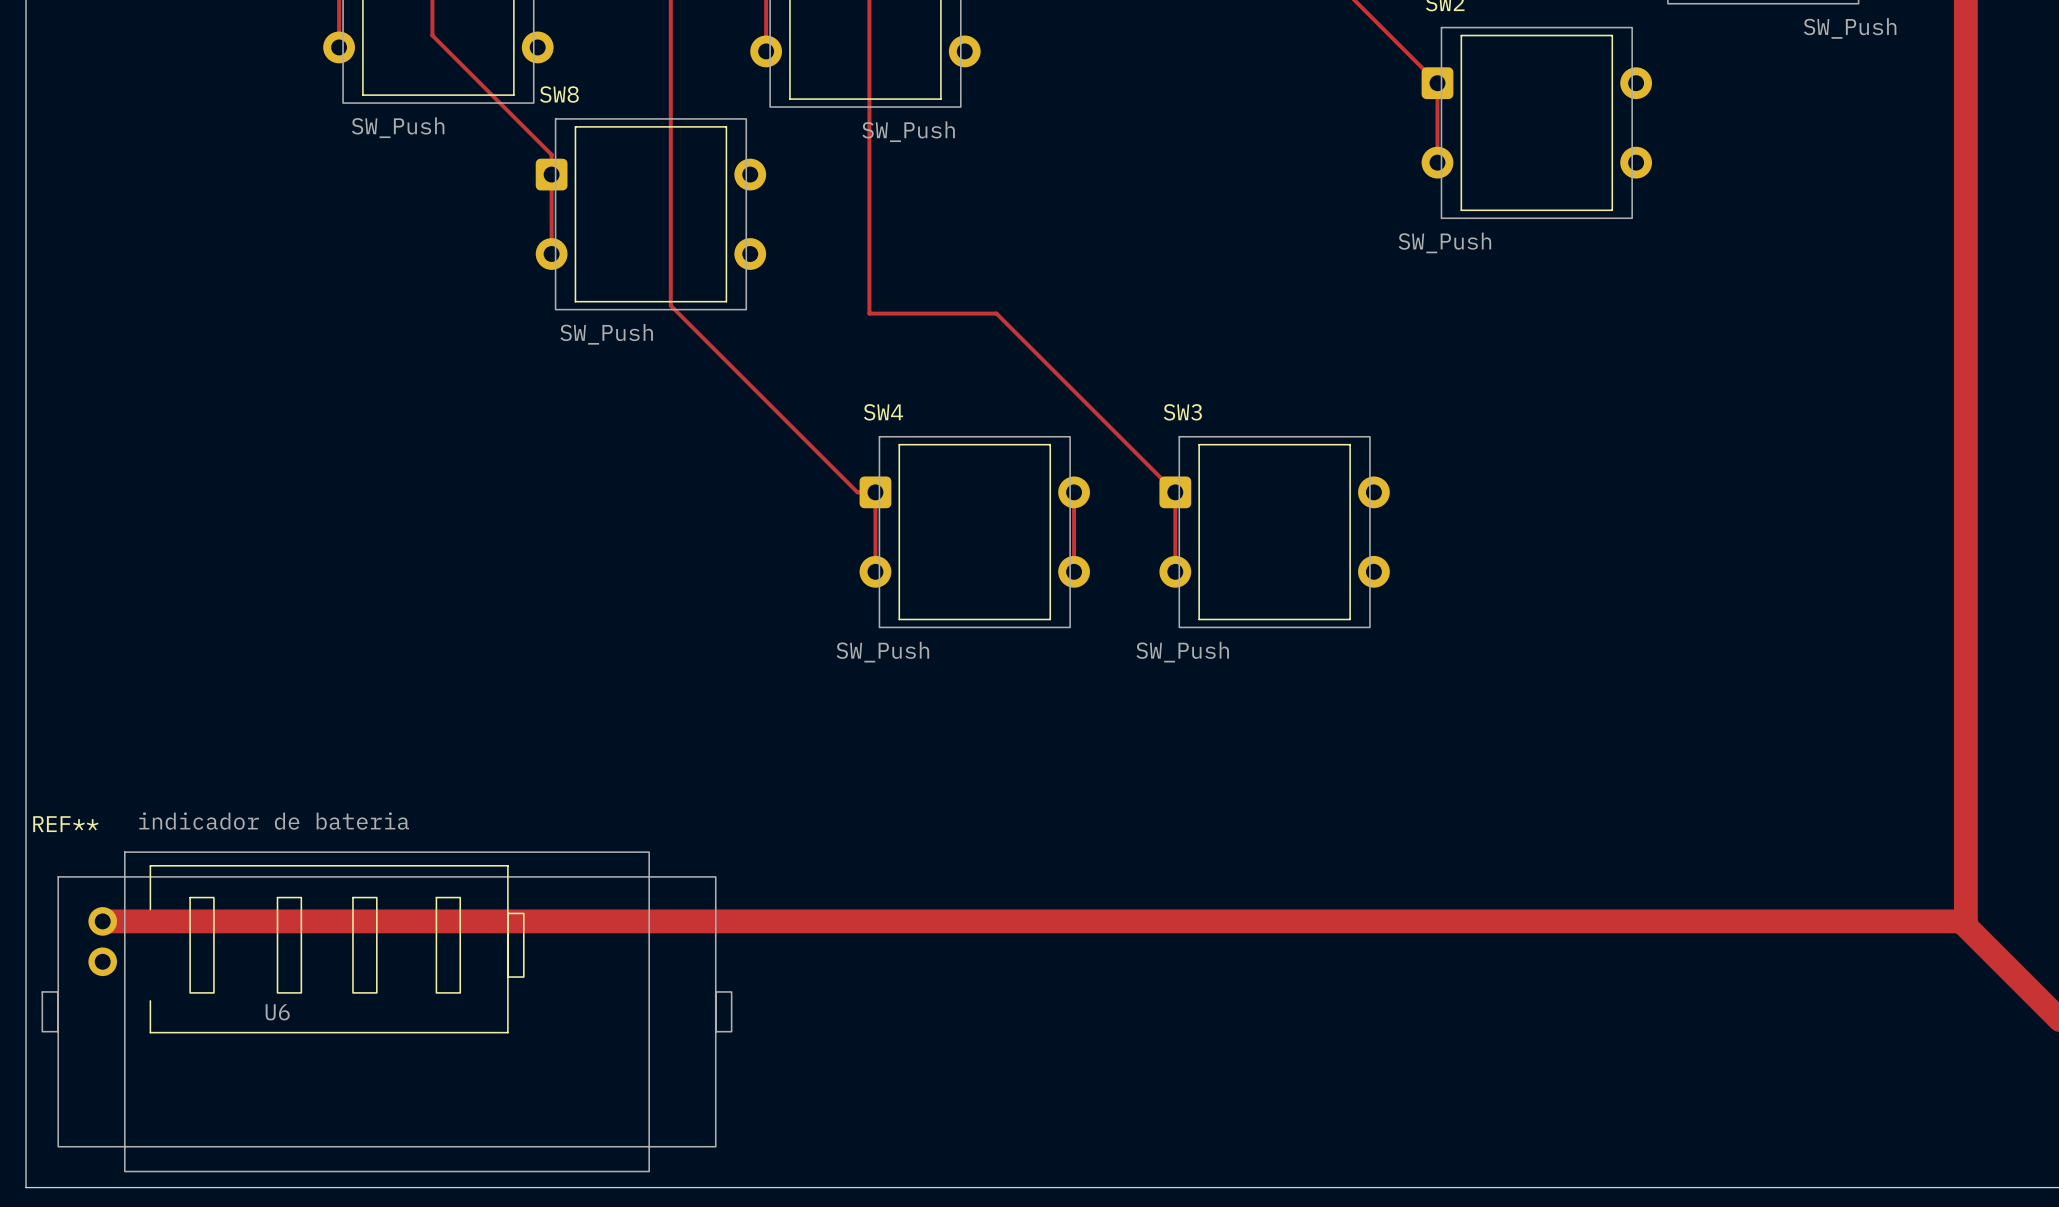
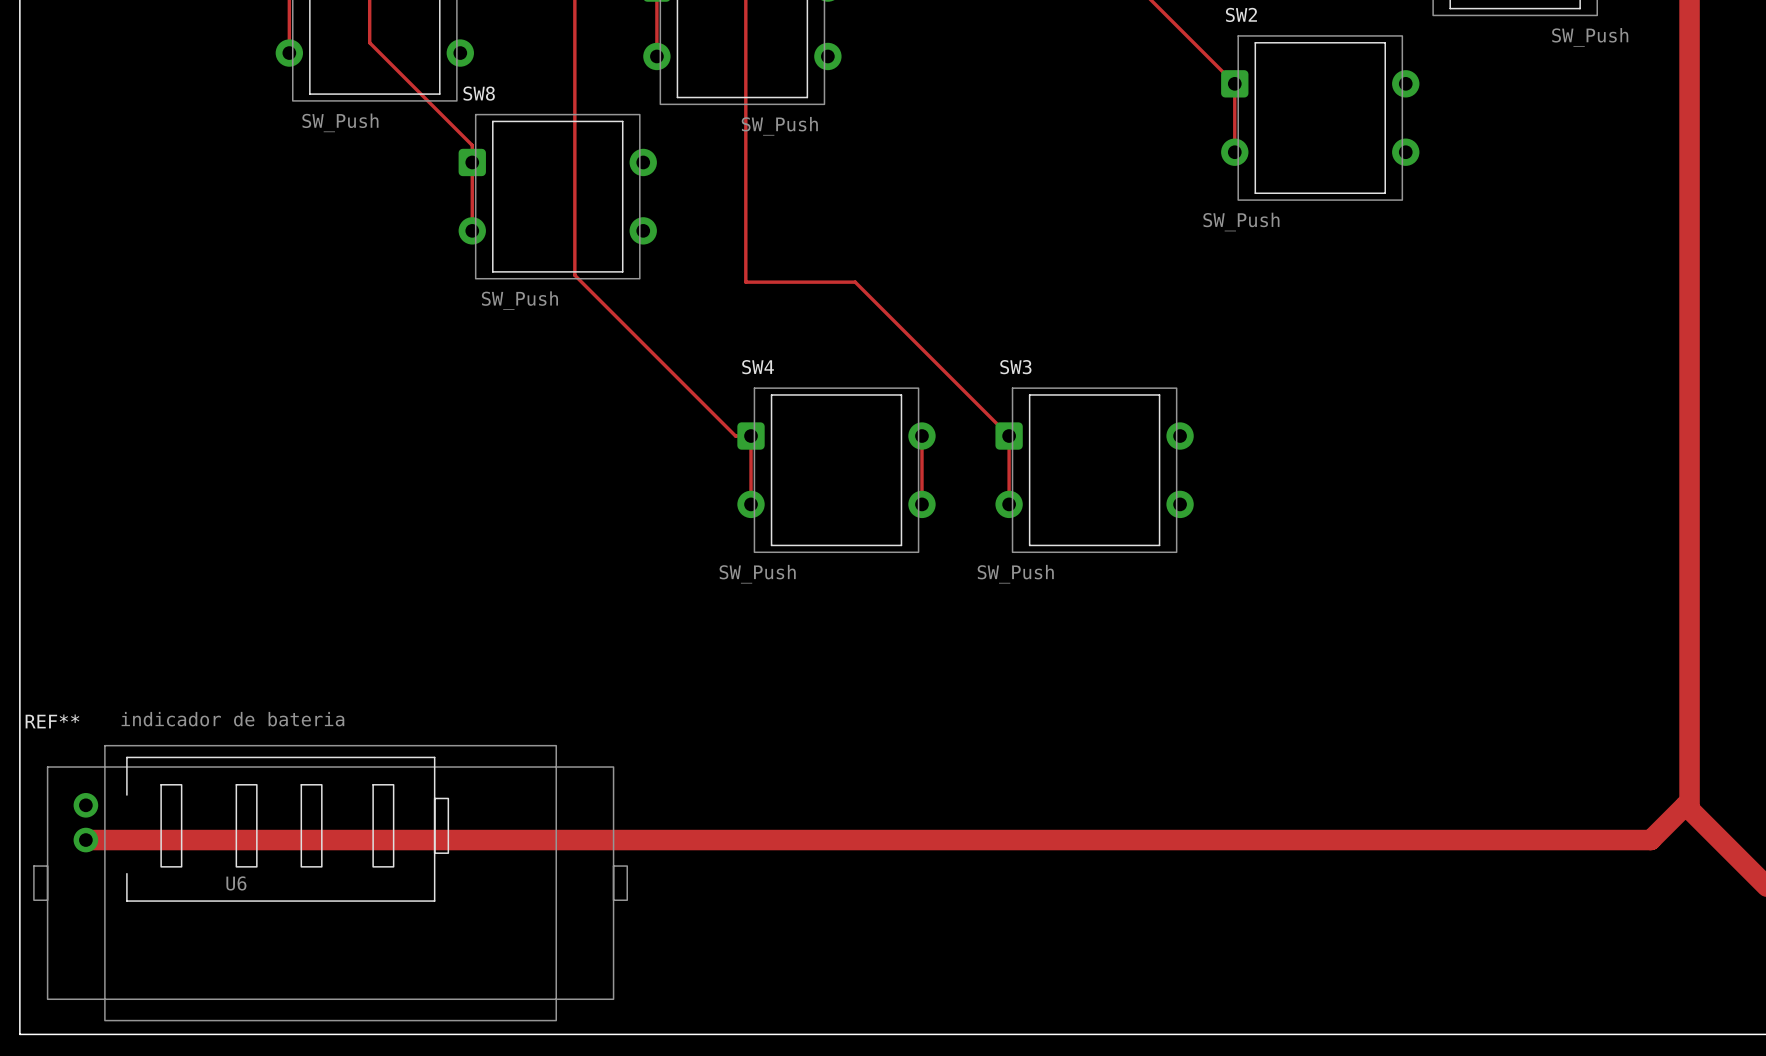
top track: (102, 921) (1961, 921) -> (85, 840) (1650, 840) (1685, 805)

